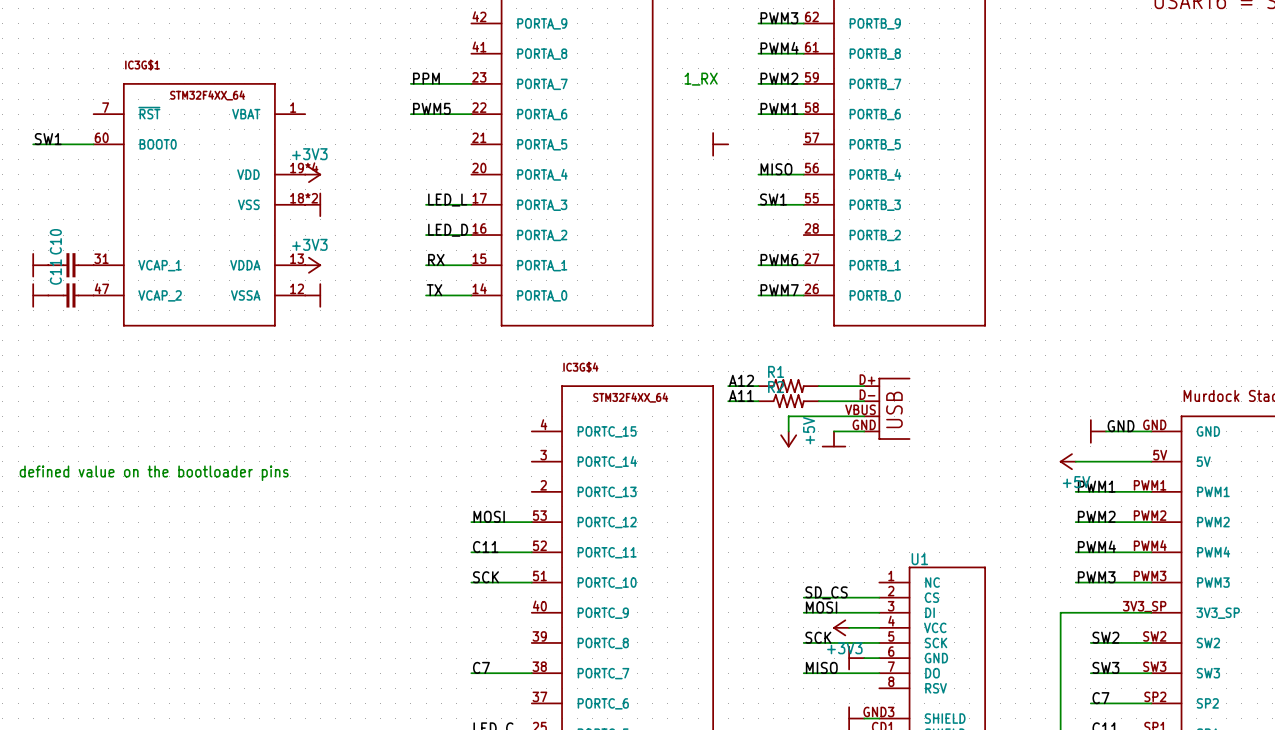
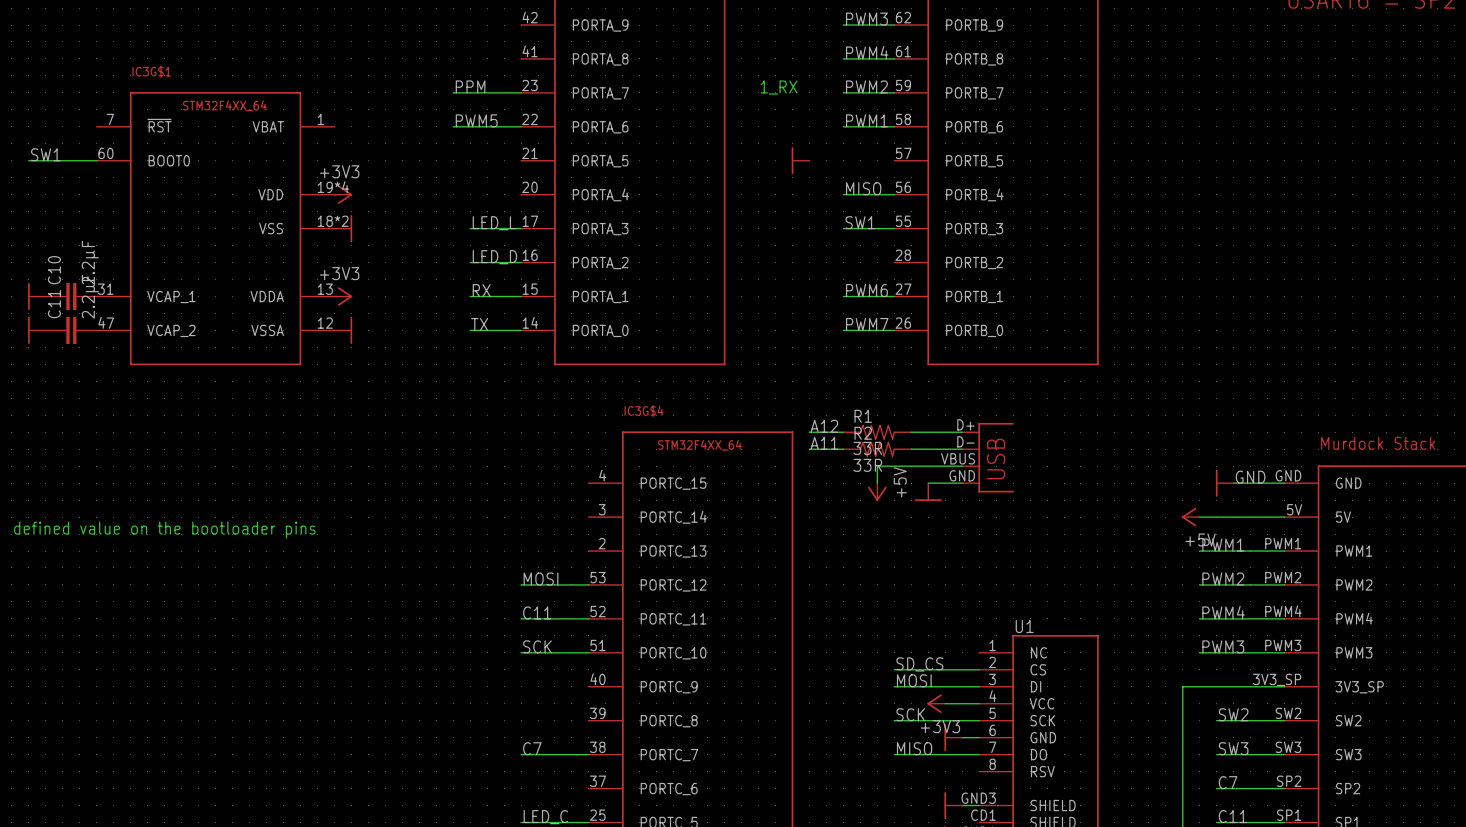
C10 value: none -> 2.2µF (90, 262)
C11 value: none -> 2.2µF (90, 296)
R1 value: none -> 33R (867, 448)
R2 value: none -> 33R (867, 465)

